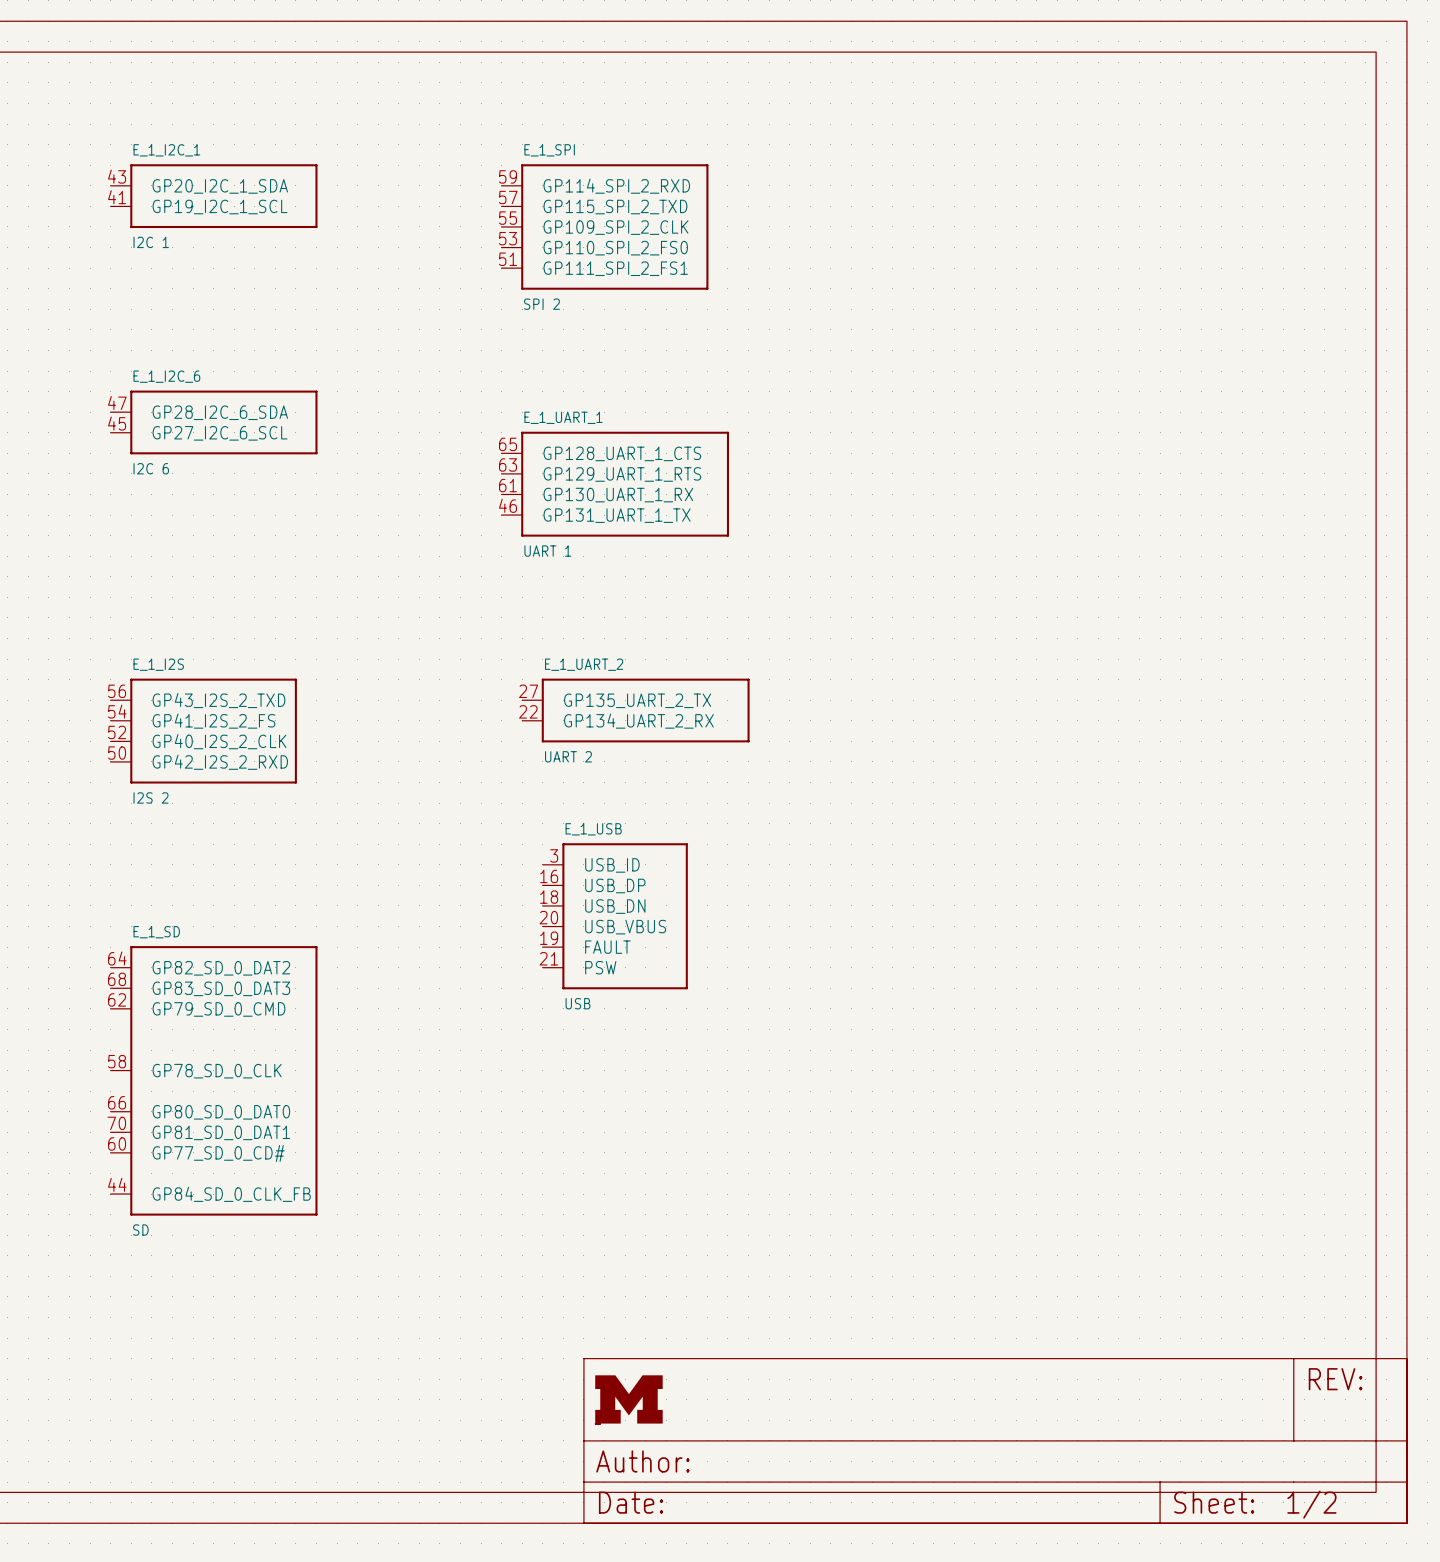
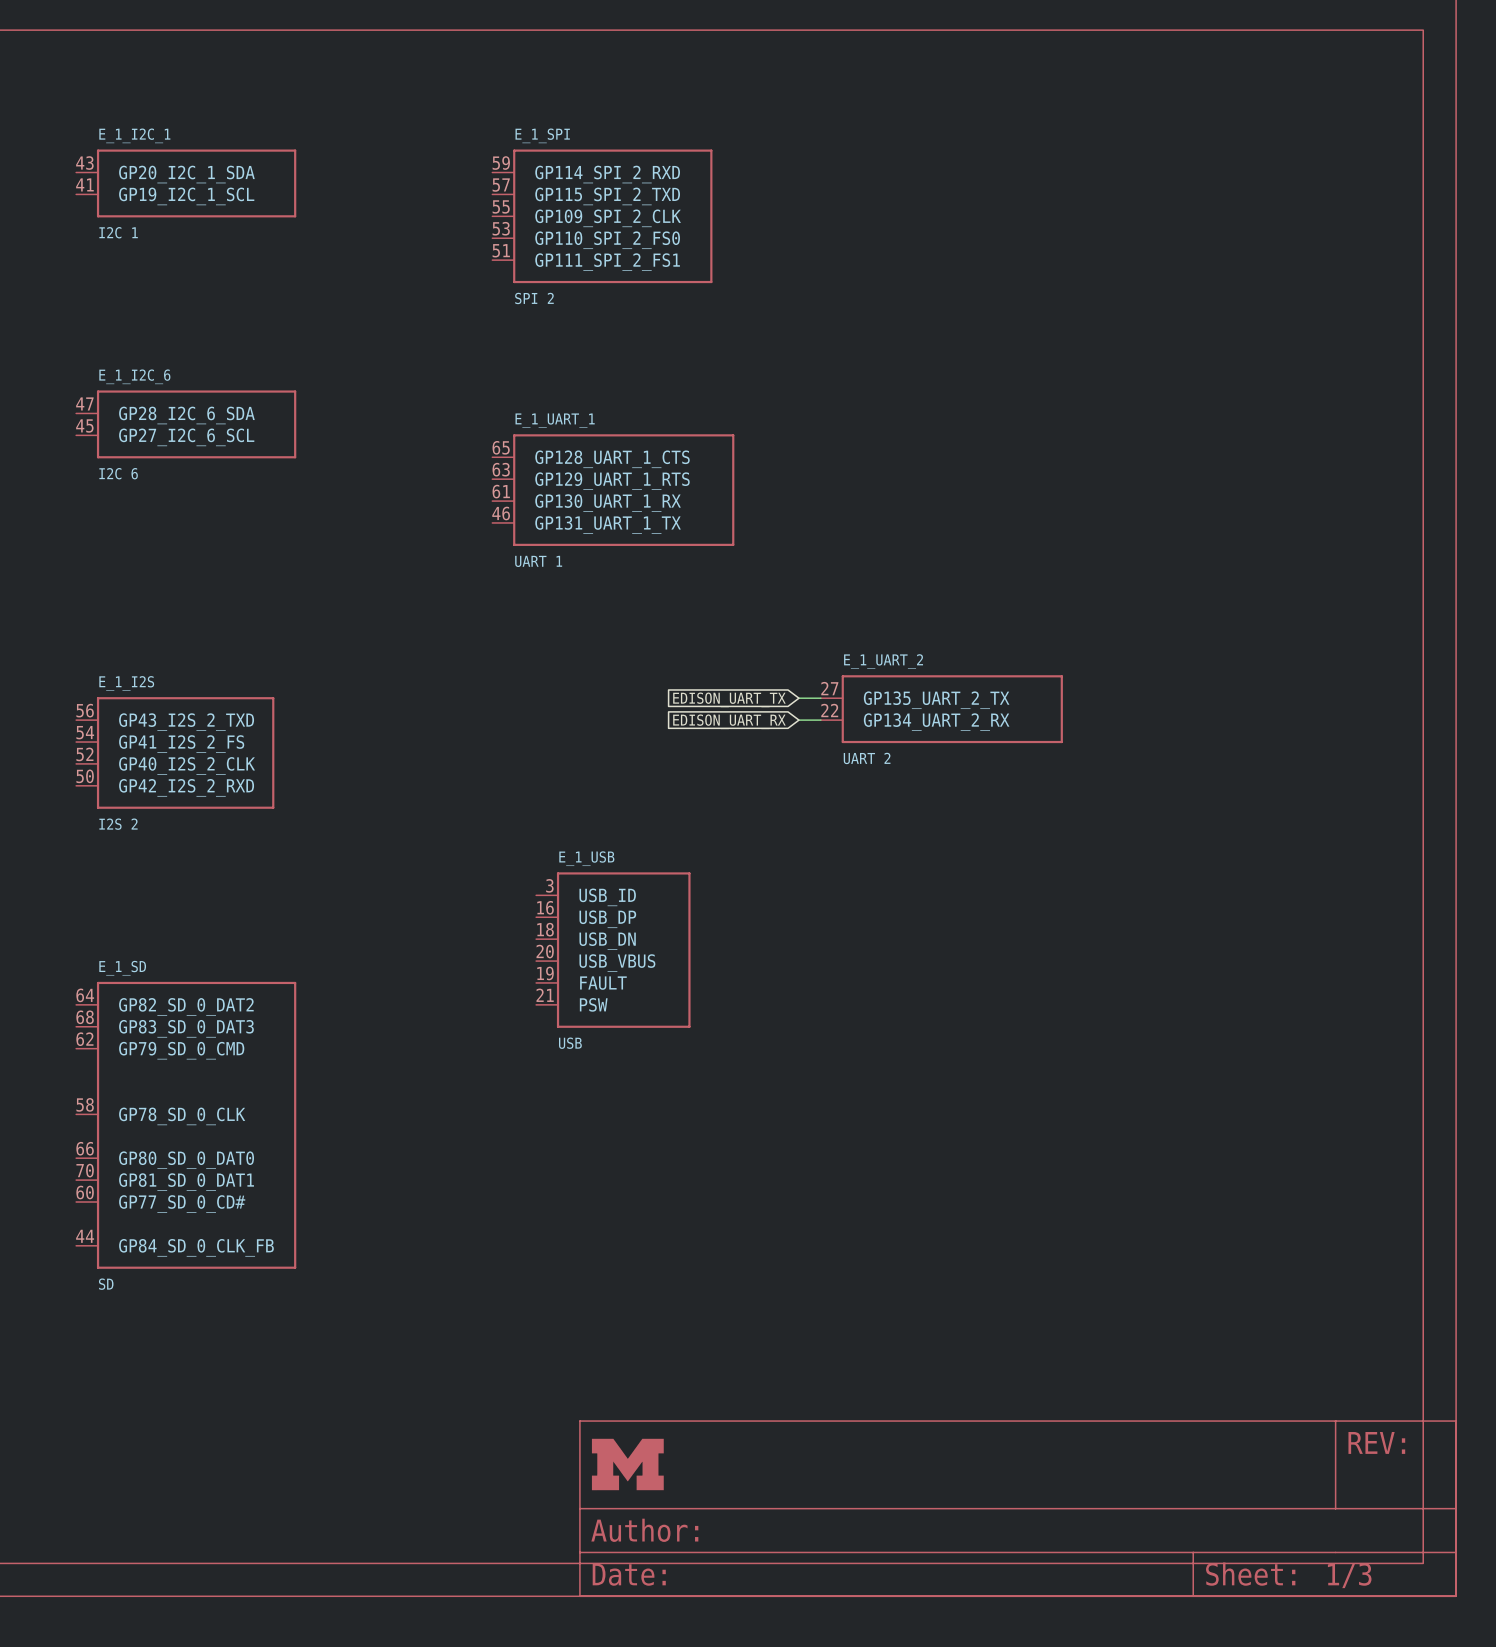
wire: none -> (798, 698) (820, 698)
global label: none -> EDISON_UART_TX (729, 699)
global label: none -> EDISON_UART_RX (729, 721)
wire: none -> (798, 720) (820, 720)
E_1_UART_2 position: (635, 710) -> (941, 709)
part text: 1/2 (1311, 1504) -> 1/3 (1349, 1575)

